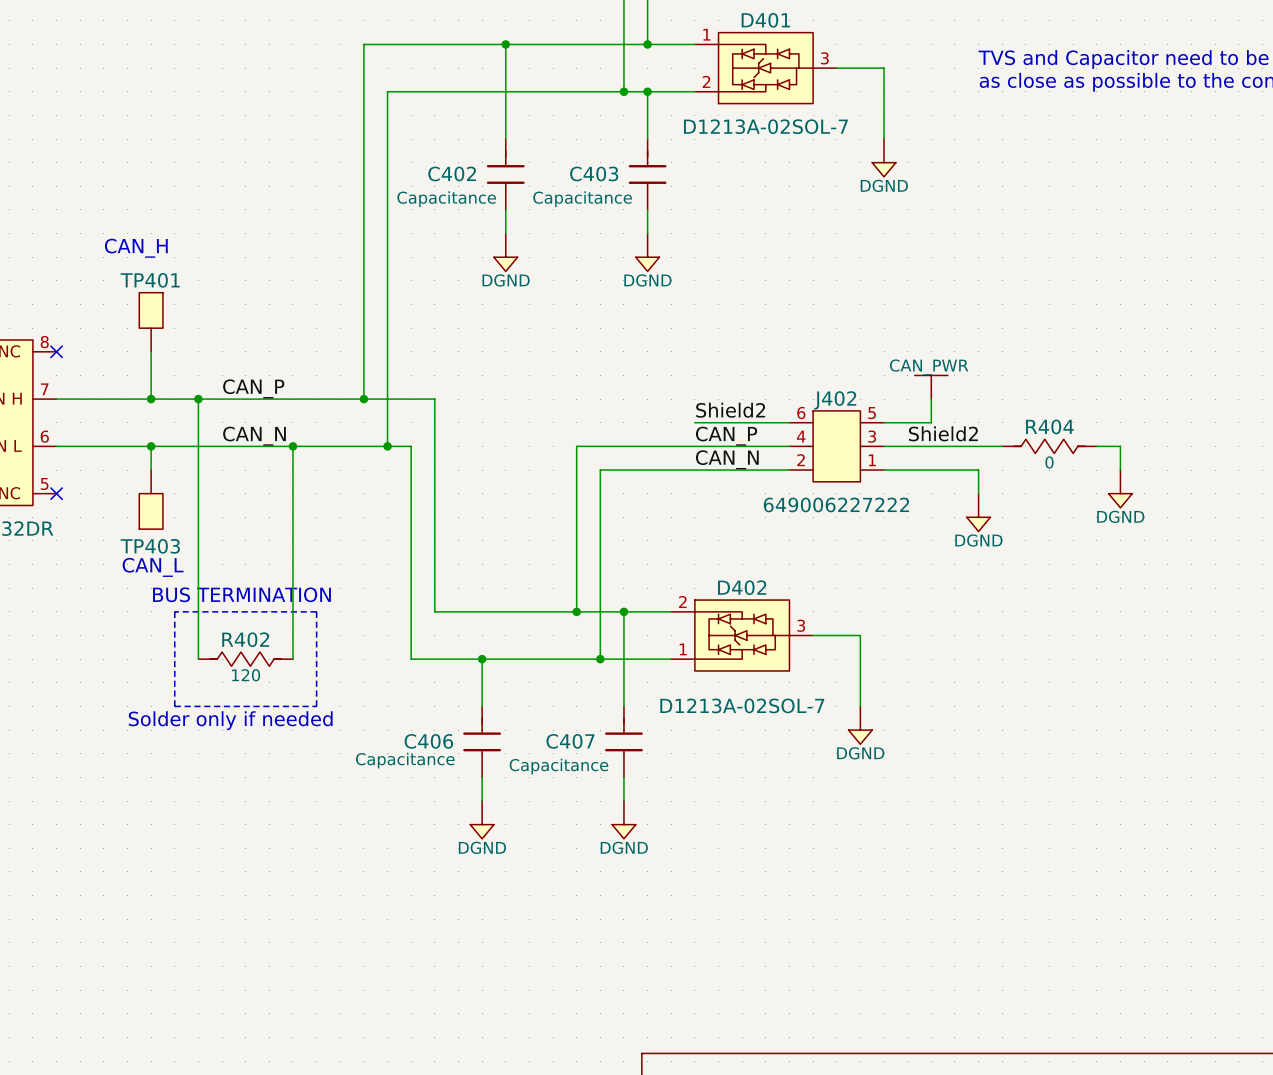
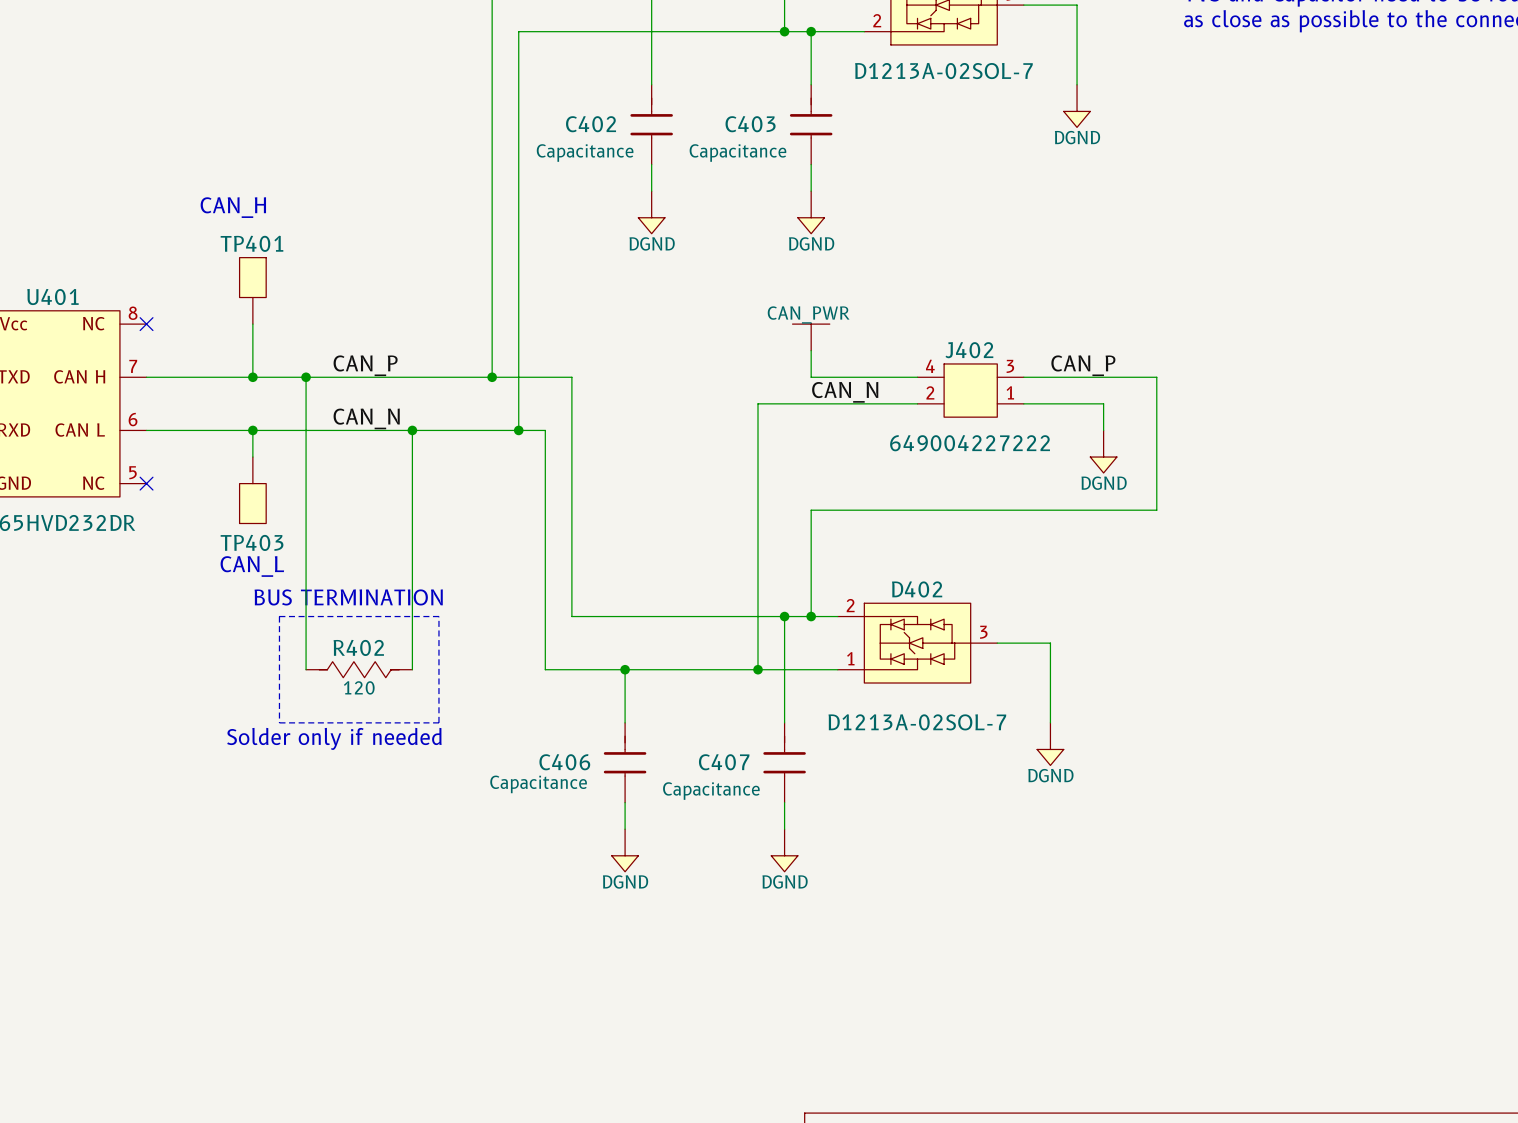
power symbol: none -> CAN_PWR (811, 337)
wire: none -> (811, 350) (811, 377) (917, 377)
power symbol: CAN_PWR (931, 387) -> none
wire: none -> (1023, 377) (1156, 377) (1156, 510) (811, 510) (811, 616)
wire: (931, 399) (931, 422) (907, 422) -> (1103, 430) (1103, 403)
label: Shield2 (730, 410) -> none
J402 symbol: [789, 410, 885, 482] -> [917, 363, 1024, 418]
label: Shield2 (943, 433) -> none
label position: CAN_P (726, 436) -> CAN_P (1083, 365)
wire: (789, 446) (576, 446) (576, 611) -> none
wire: (884, 446) (1002, 446) -> none
R404: (1049, 446) -> none
wire: (1096, 446) (1120, 446) (1120, 470) -> none
label position: CAN_N (727, 459) -> CAN_N (845, 392)
wire: (600, 470) (789, 470) -> (758, 457) (758, 403) (864, 403)
wire: (884, 470) (978, 470) (978, 493) -> none
power symbol: DGND (1120, 488) -> none
J402 value: 649006227222 (836, 504) -> 649004227222 (970, 443)
power symbol position: DGND (978, 512) -> DGND (1103, 451)
junction: (576, 611) -> none
junction: none -> (811, 616)

